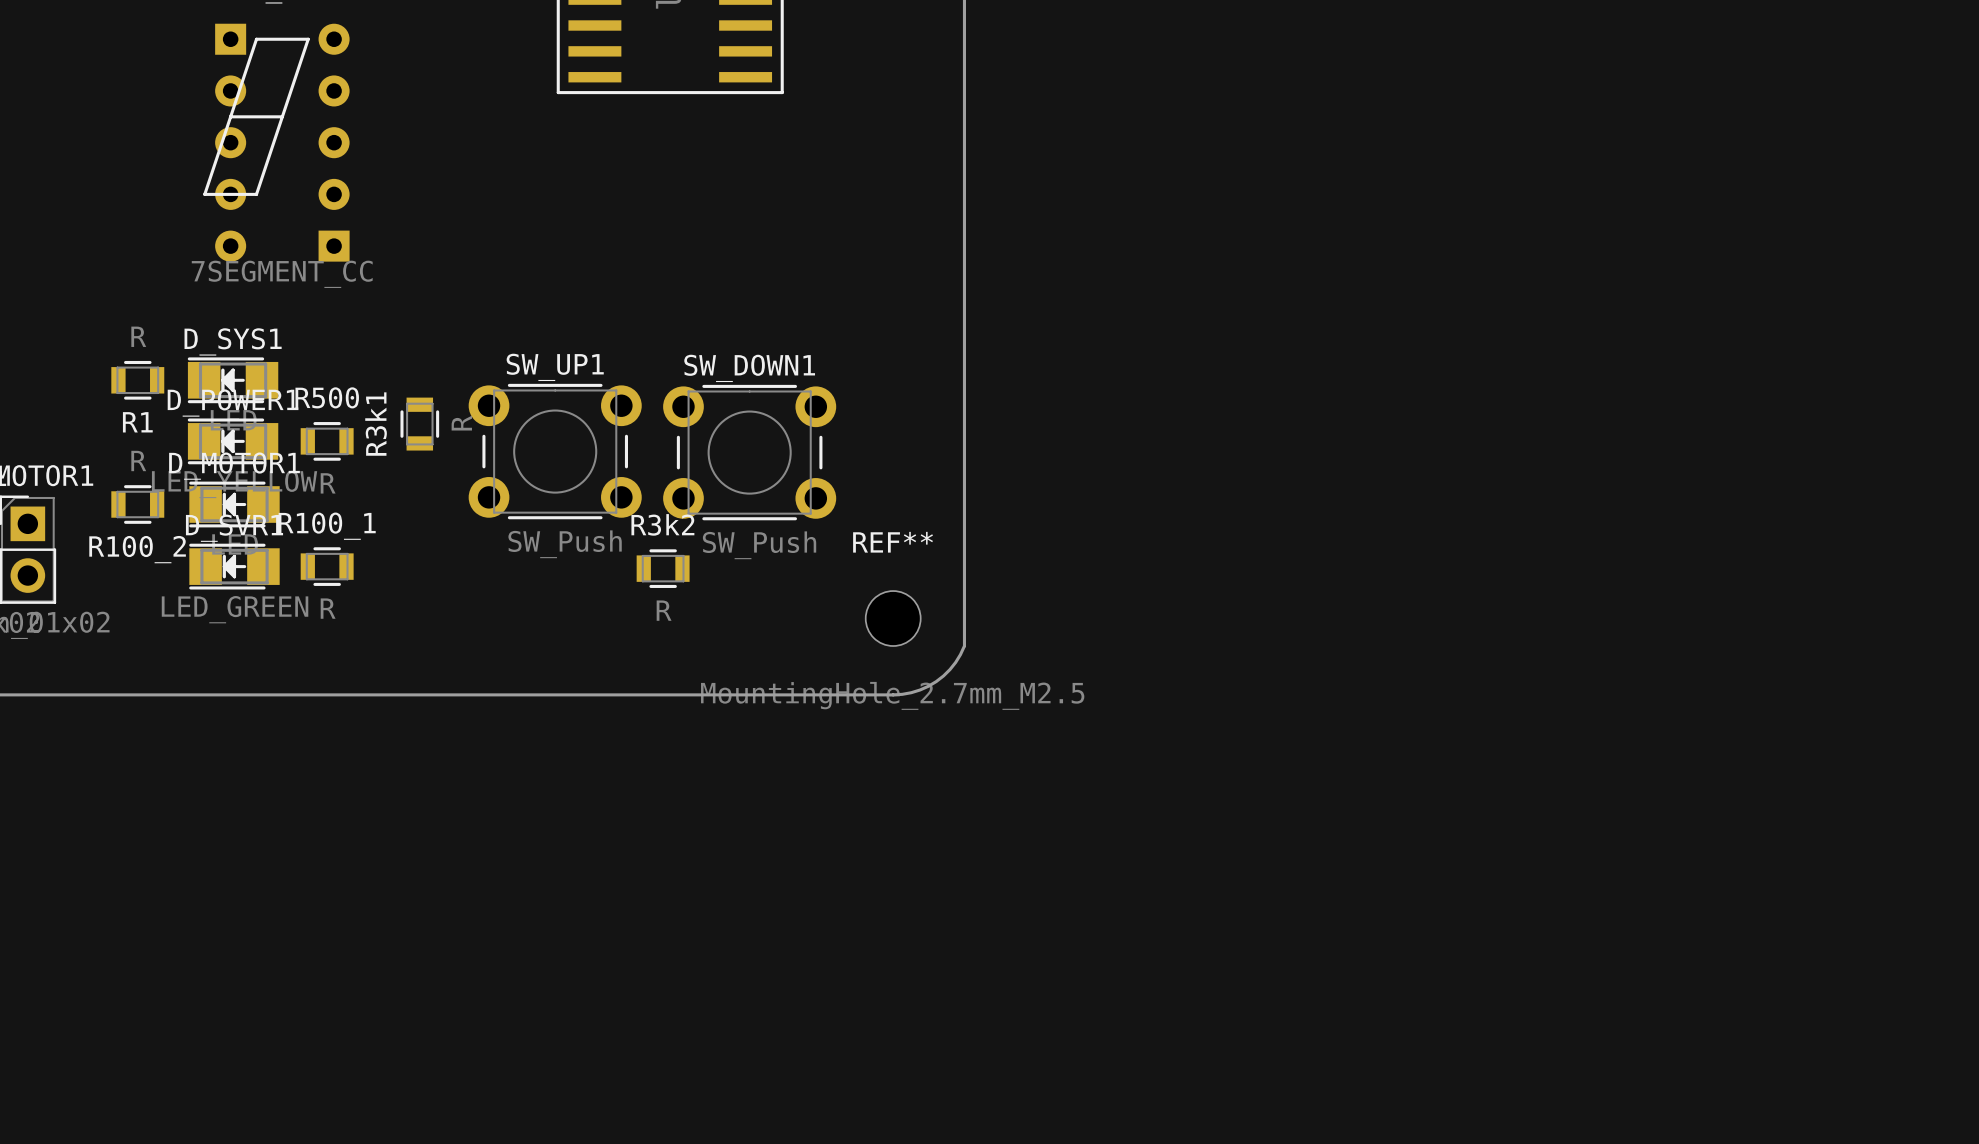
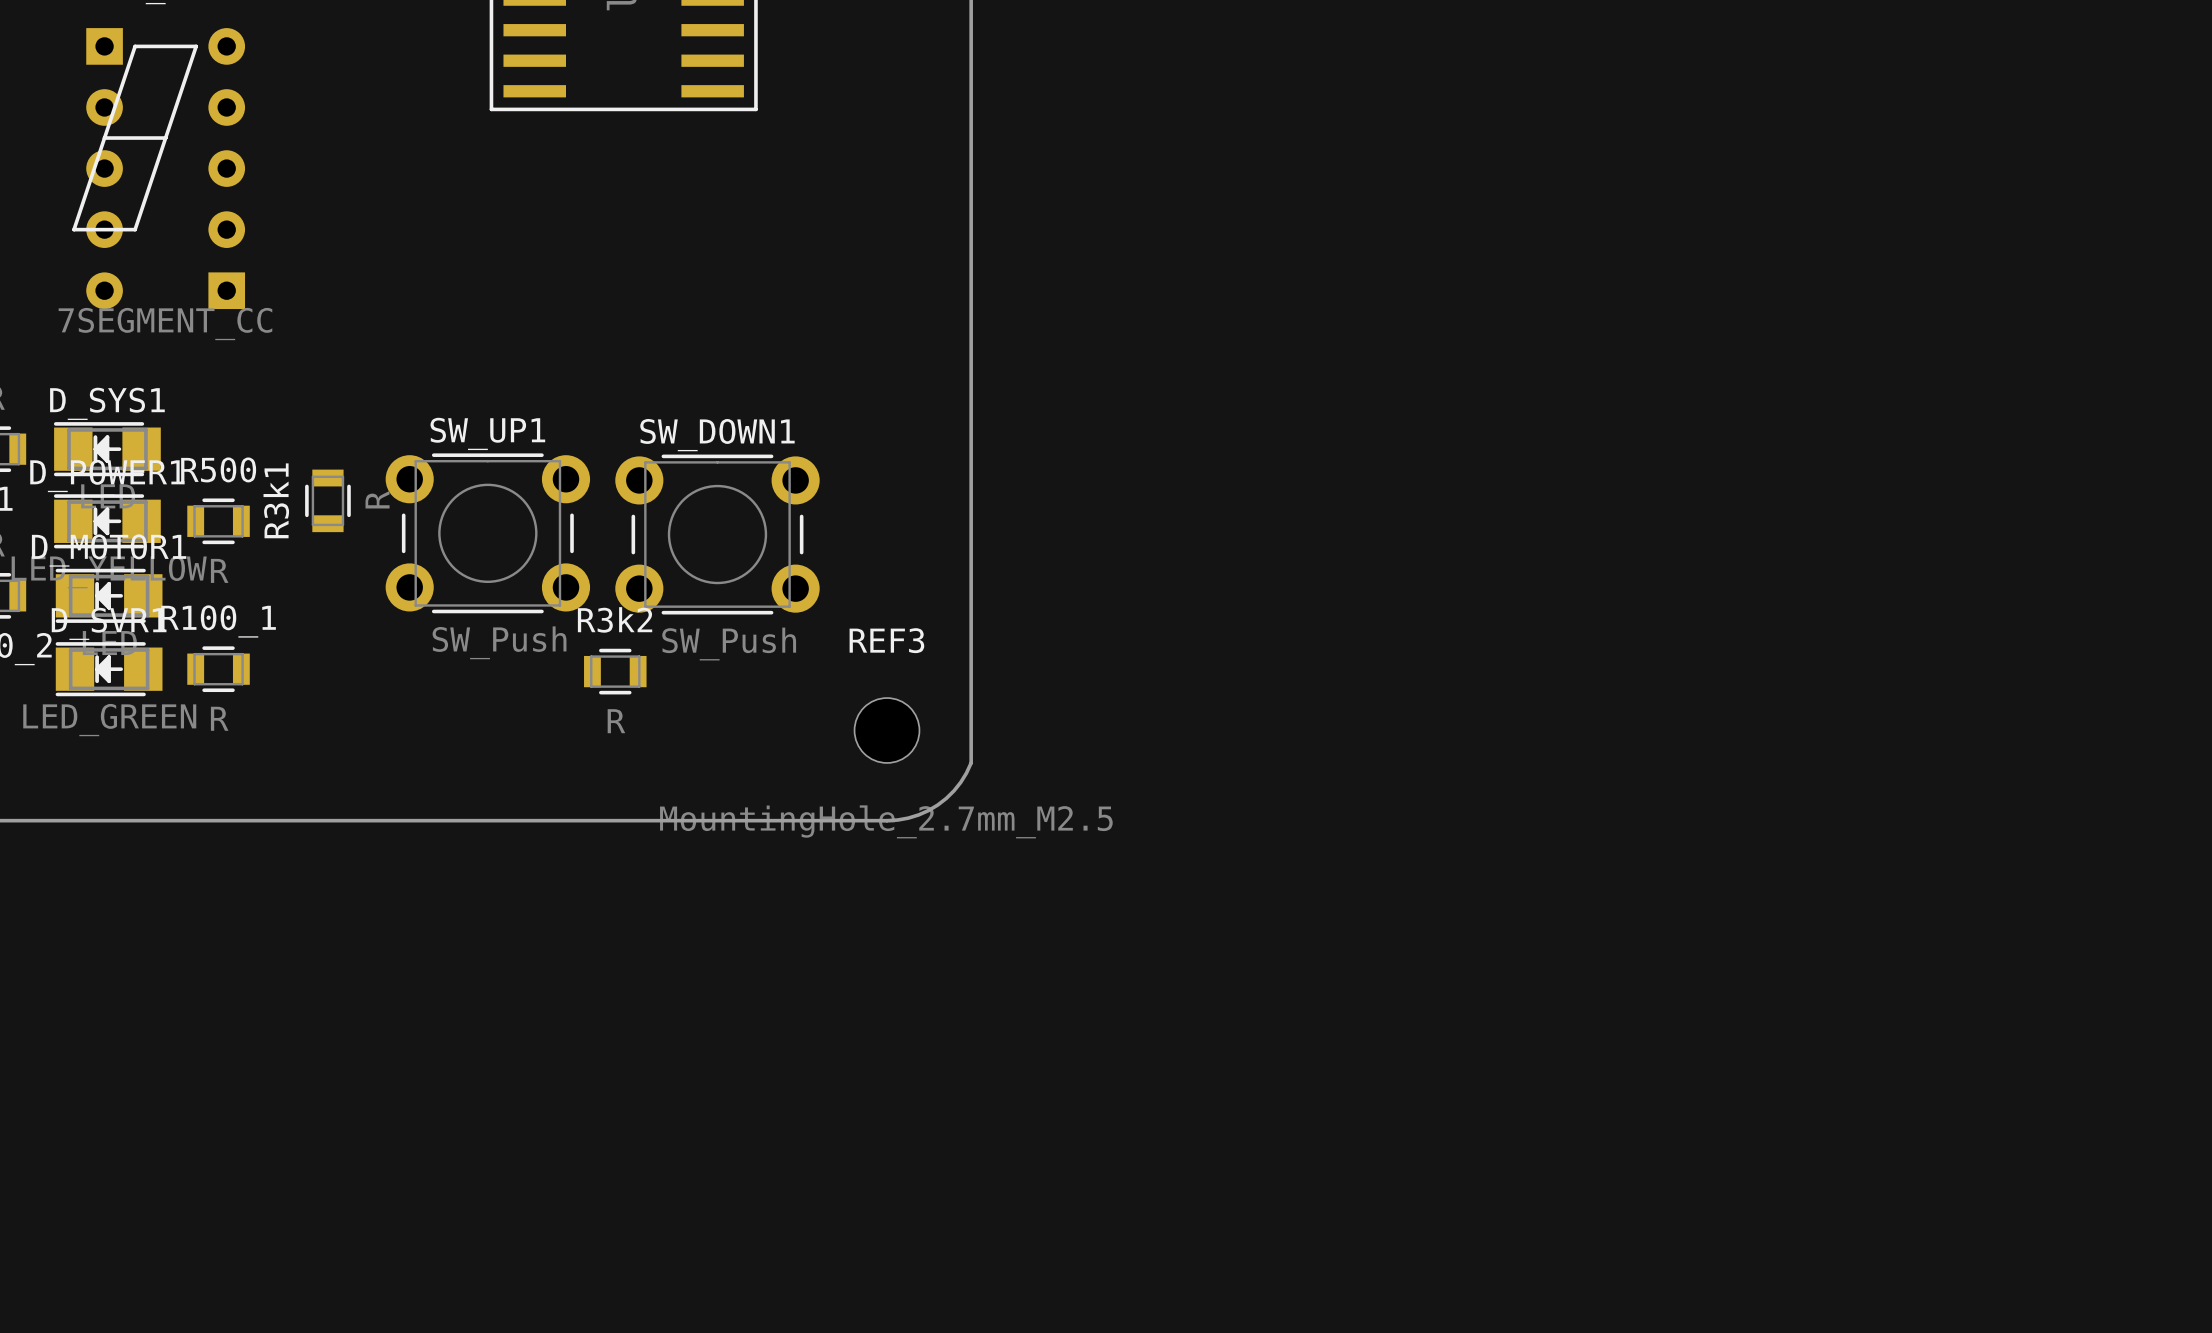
REF** name: REF** (893, 542) -> REF3 (886, 640)

